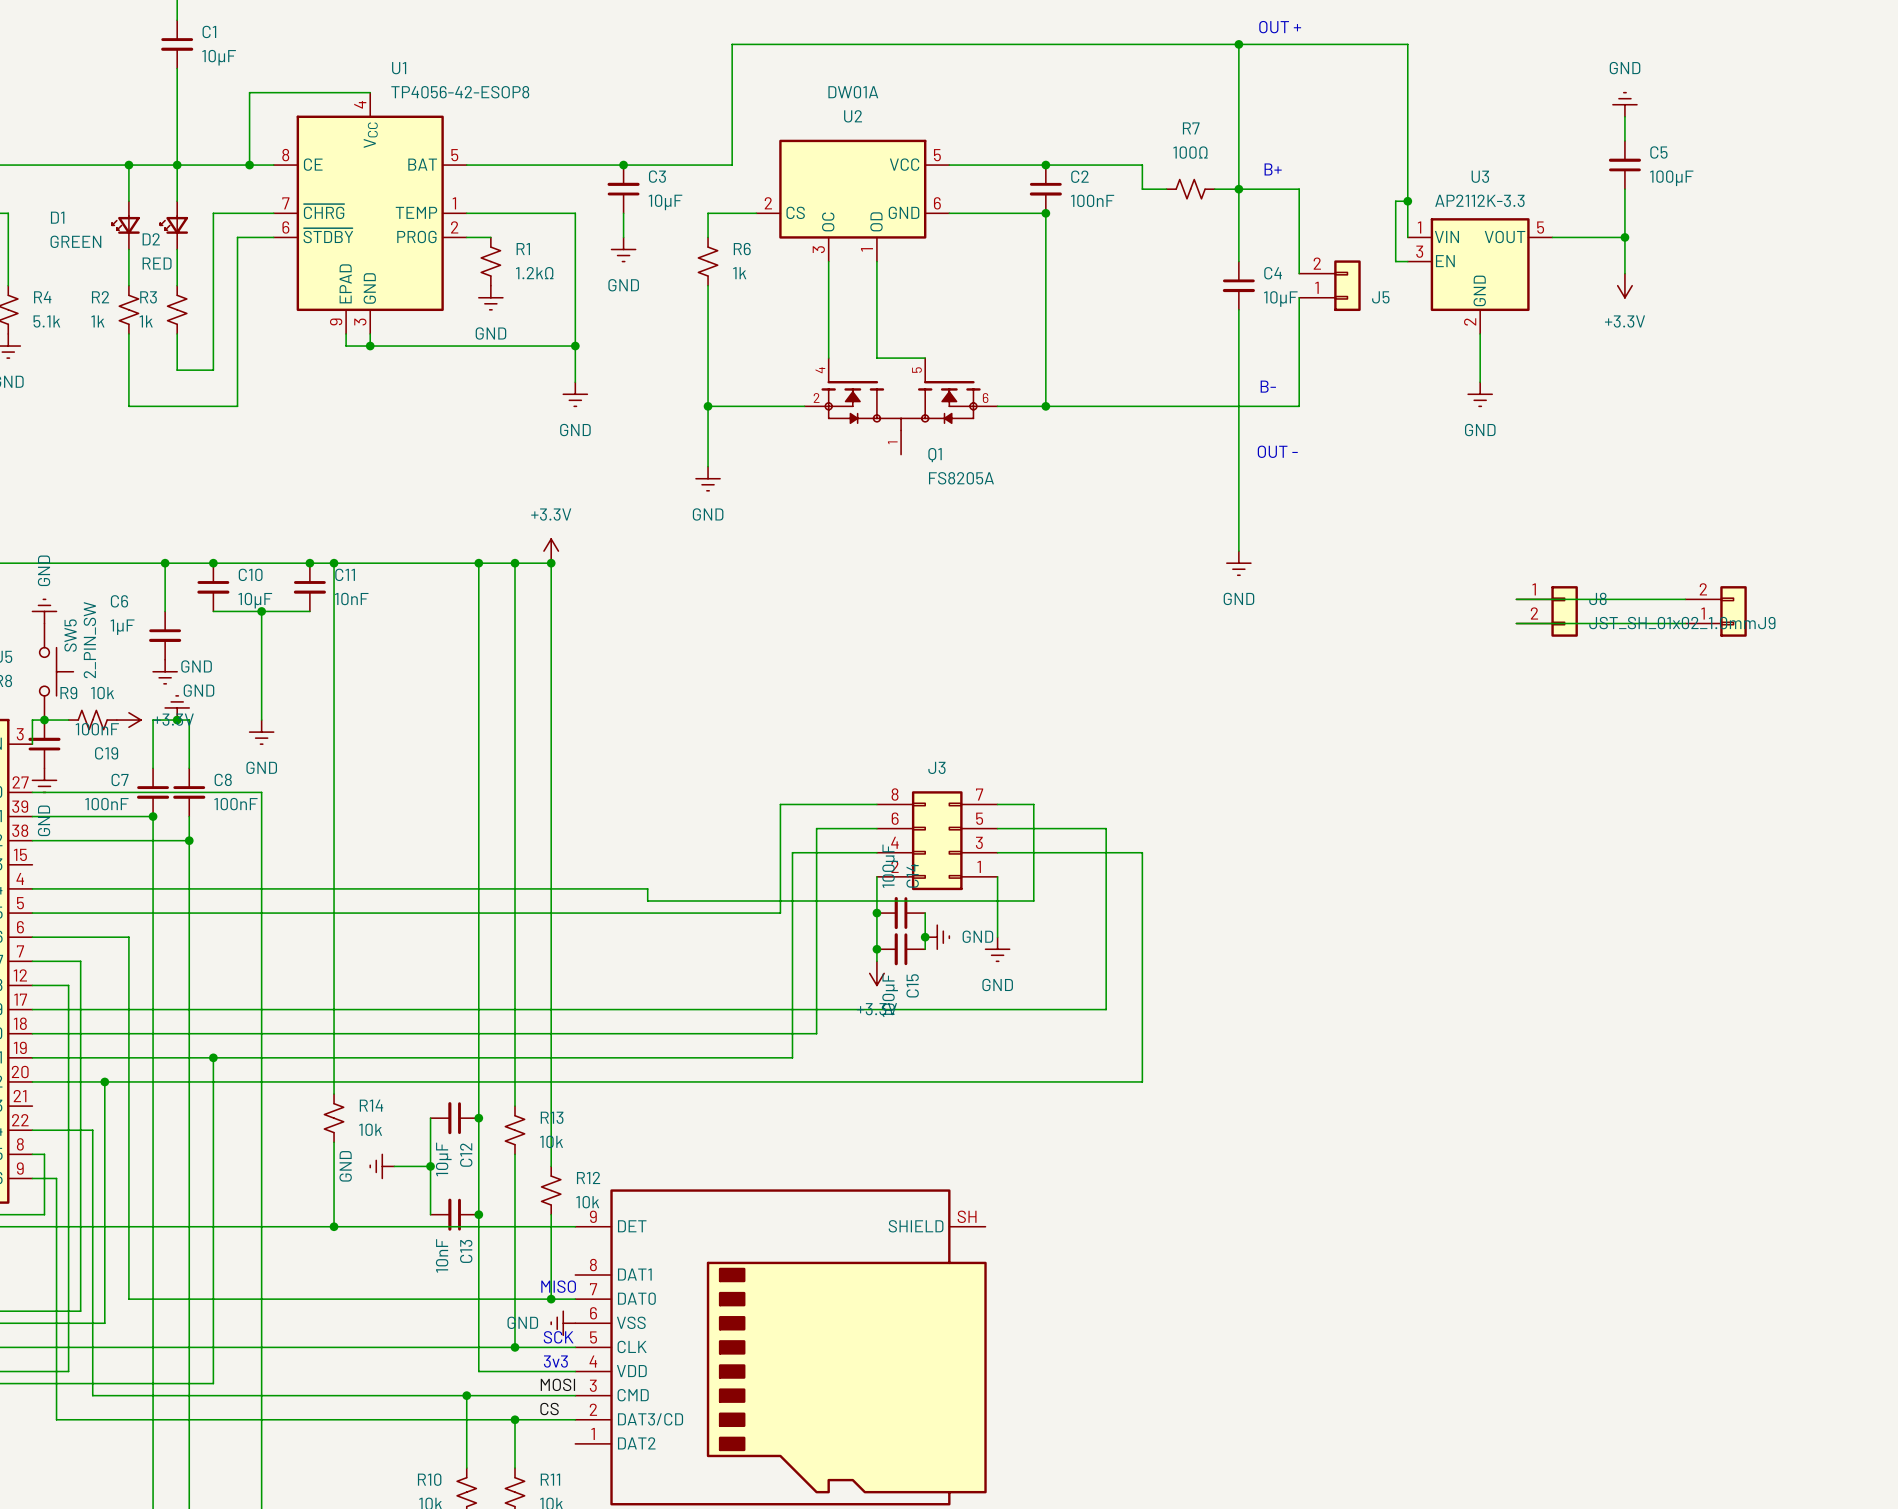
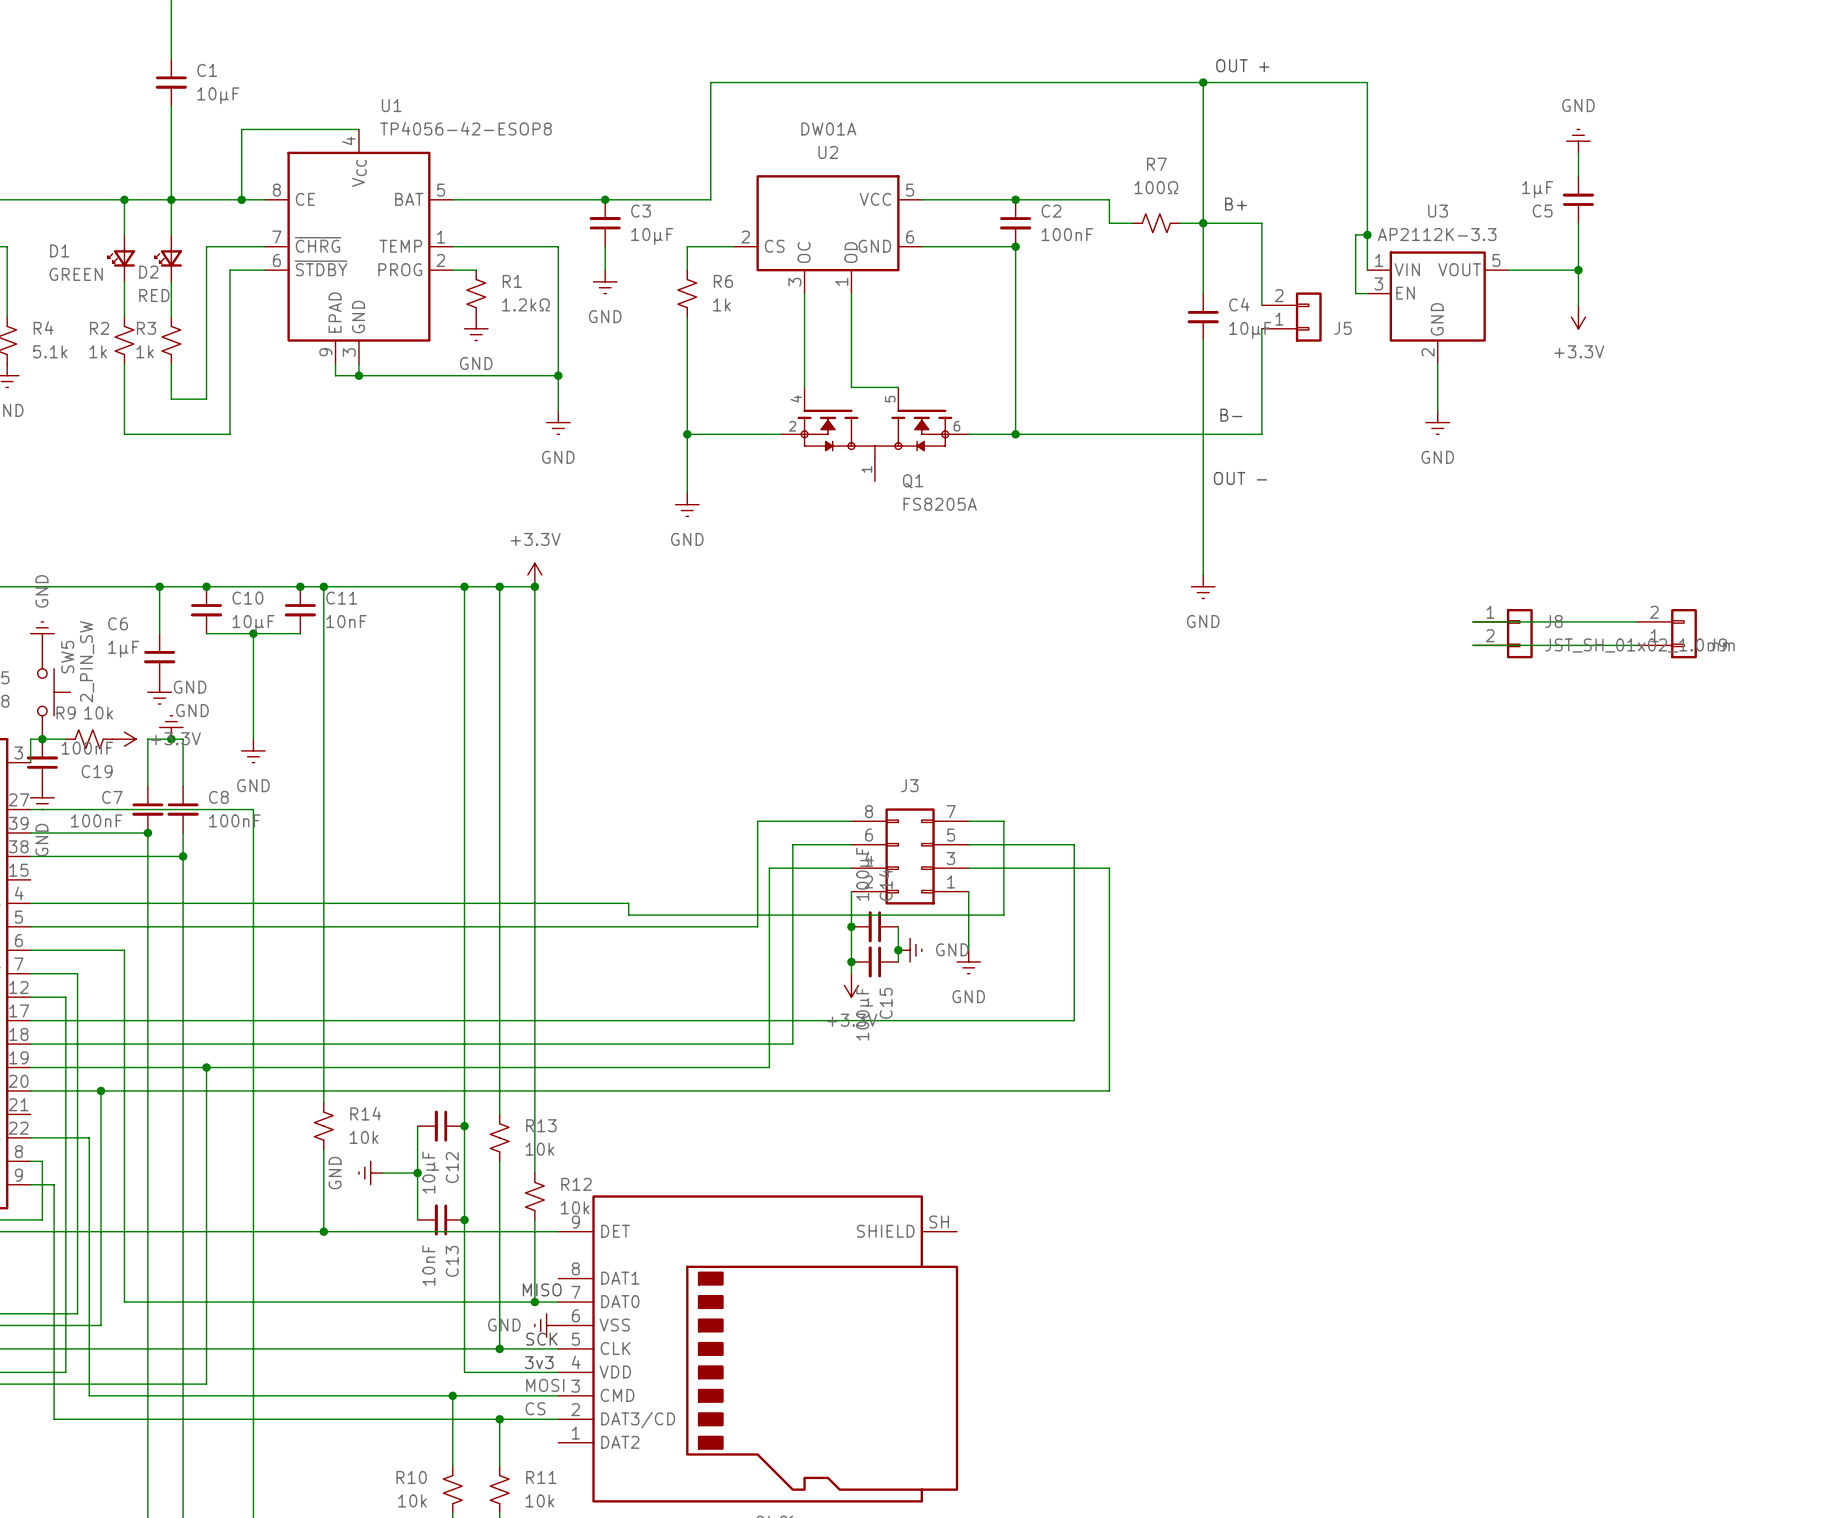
C5 name position: C5 (1658, 152) -> C5 (1542, 211)
C5 value: 100μF (1671, 178) -> 1μF (1537, 189)

